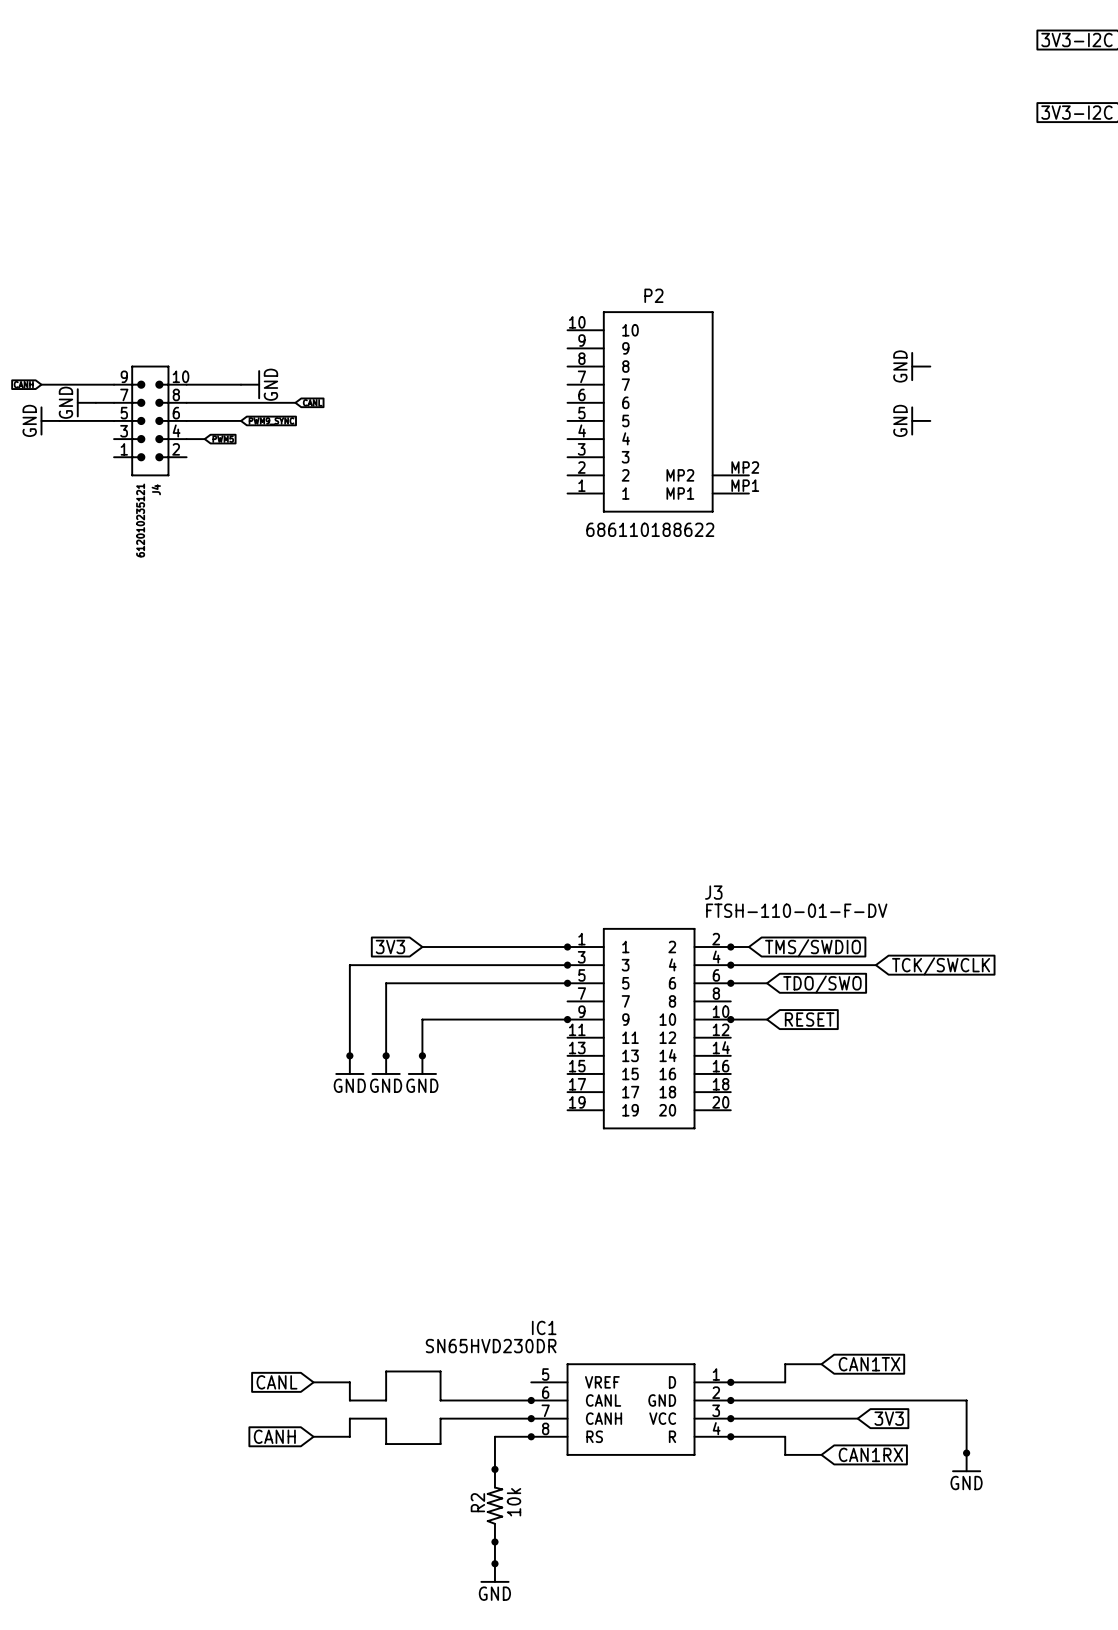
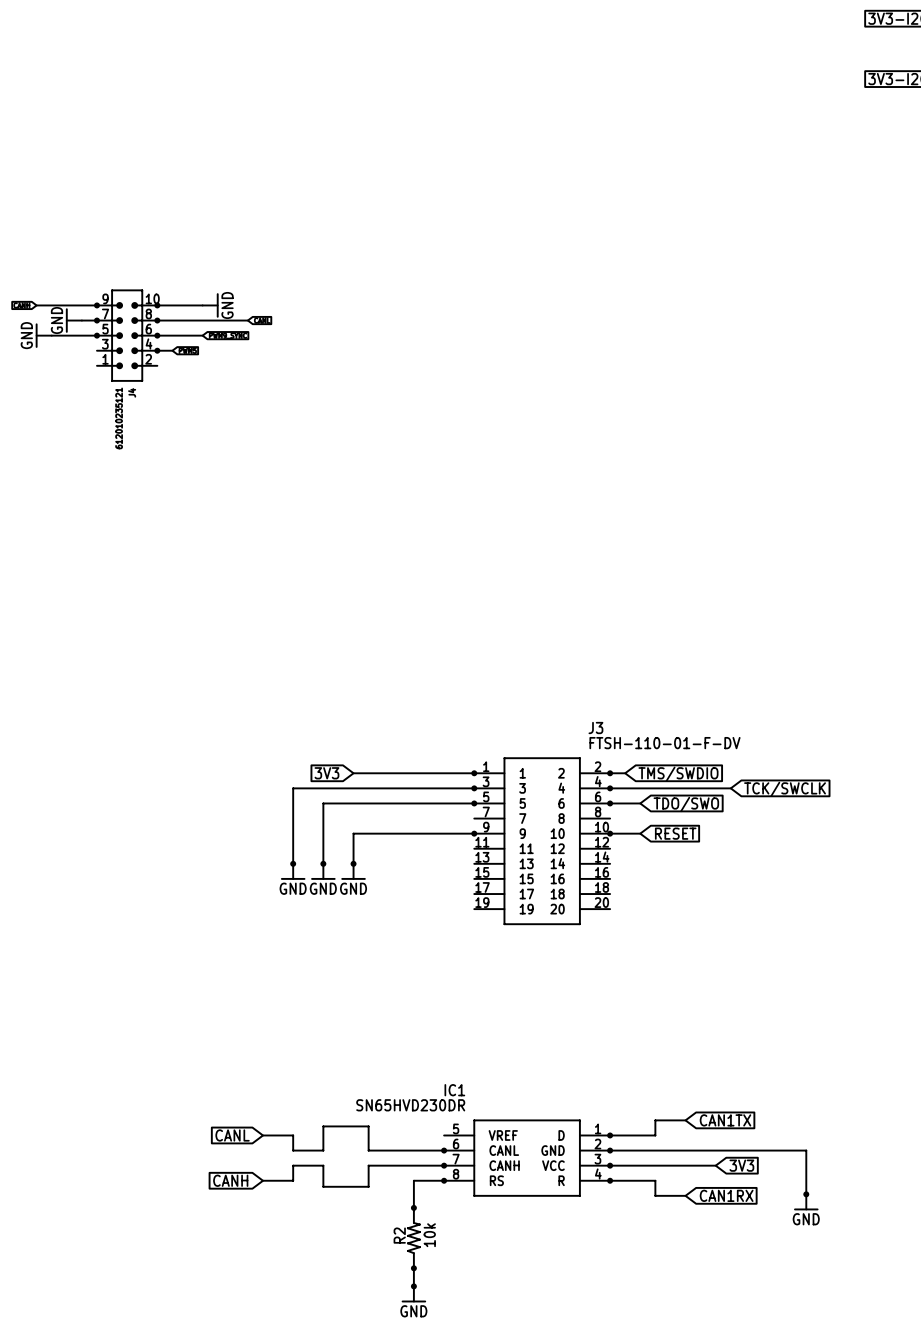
power symbol: GND (920, 366) -> none
junction: none -> (96, 305)
junction: none -> (157, 305)
junction: none -> (96, 320)
junction: none -> (157, 320)
P2: 686110188622 (658, 411) -> none
junction: none -> (96, 335)
junction: none -> (157, 335)
power symbol: GND (920, 420) -> none
junction: none -> (157, 350)

